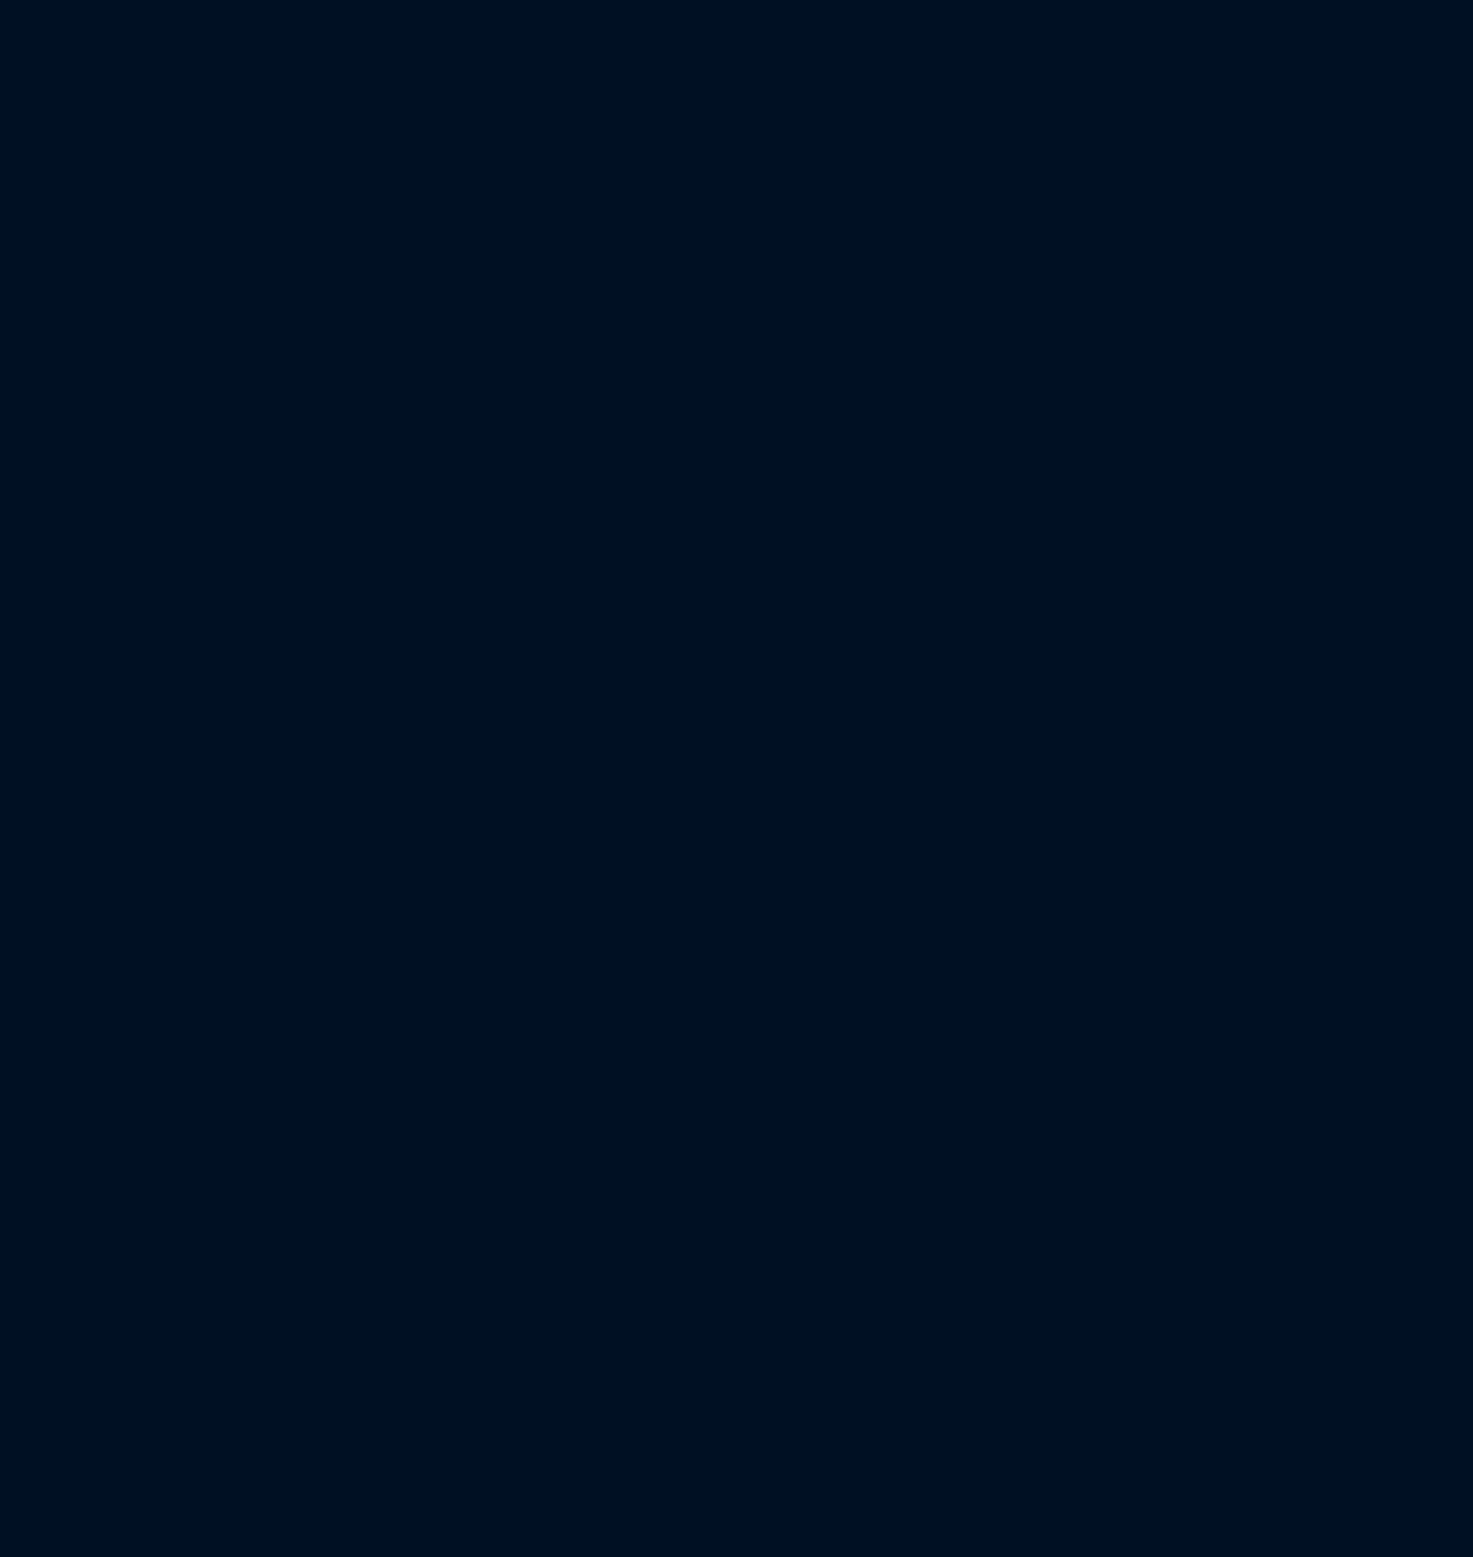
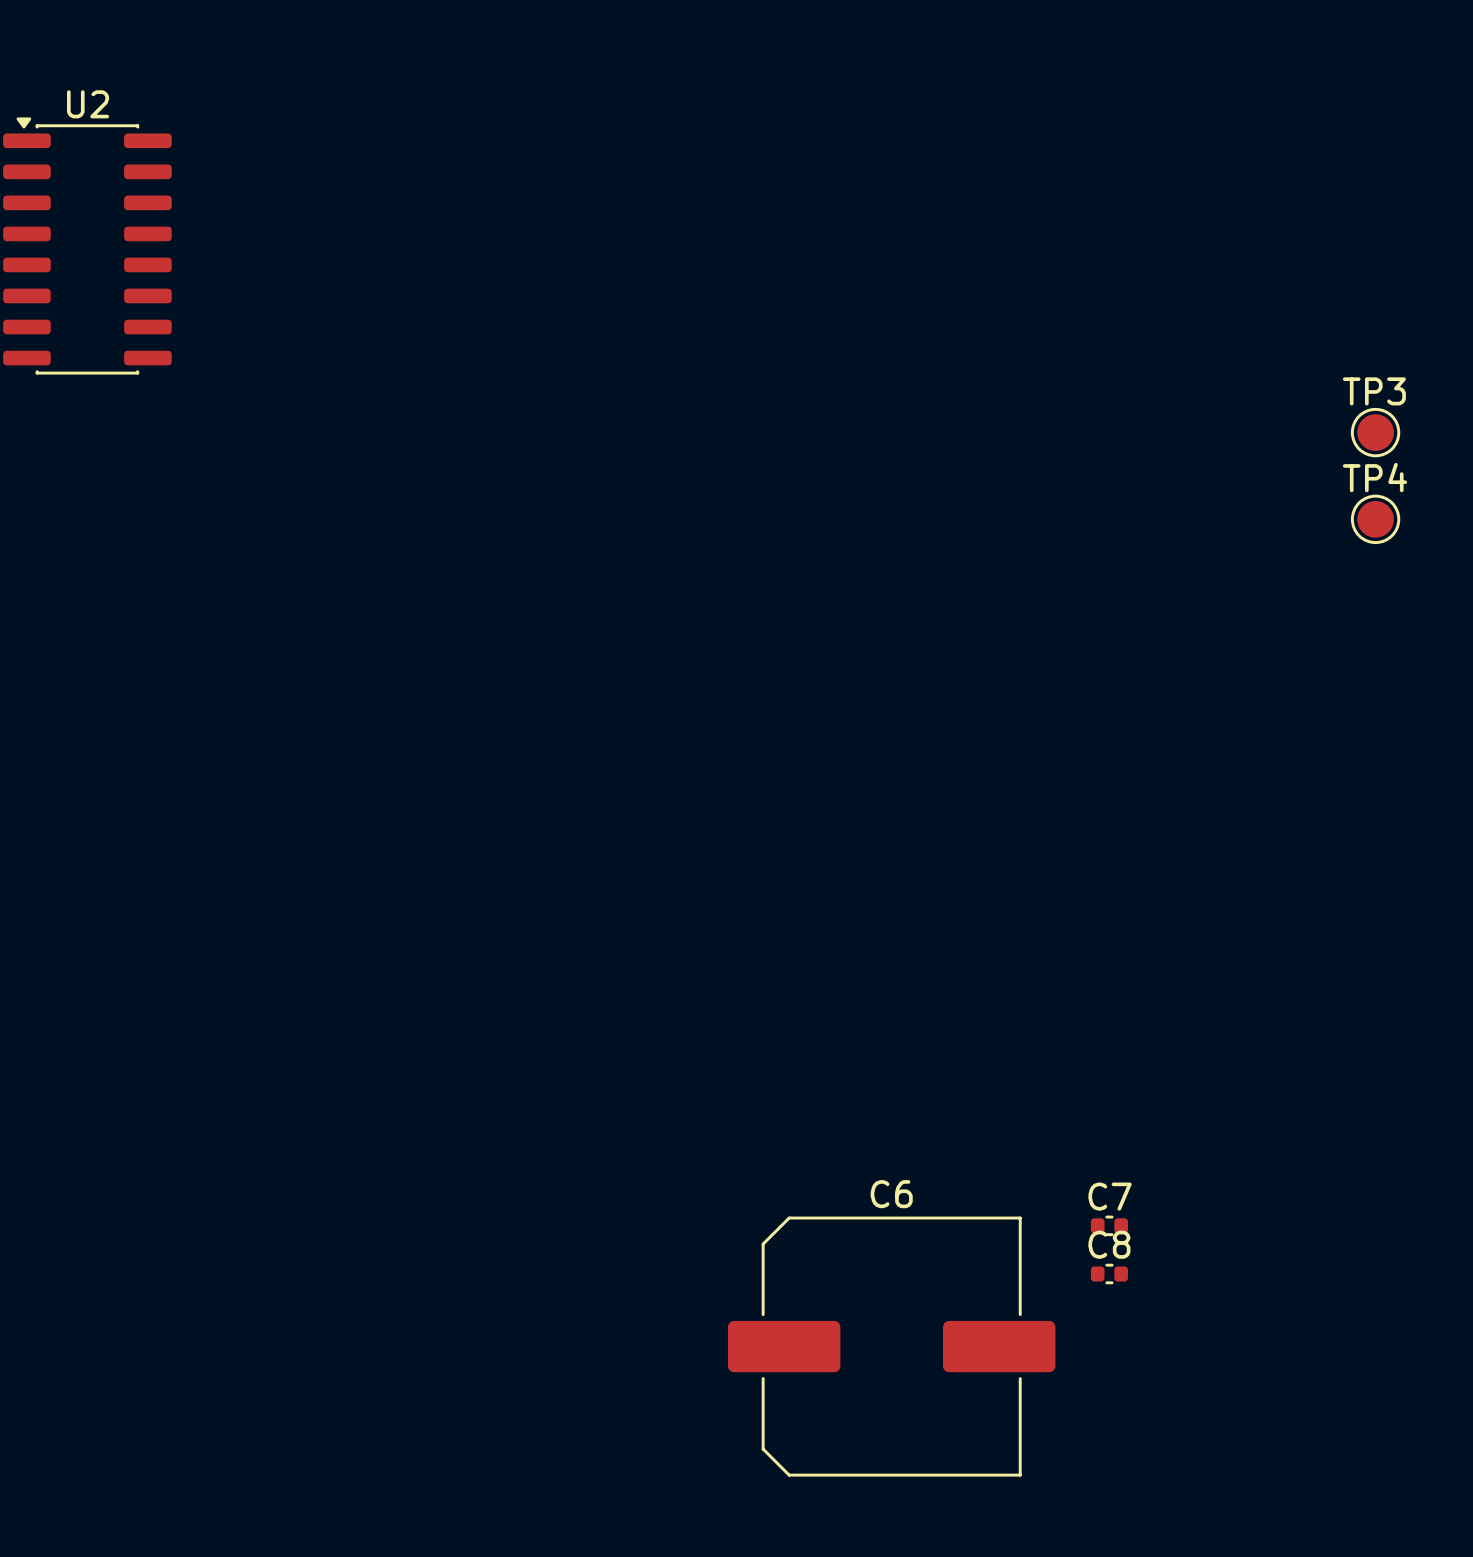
U2: none -> (87, 246)
TP3: none -> (1375, 432)
TP4: none -> (1375, 519)
C7: none -> (1109, 1225)
C8: none -> (1109, 1273)
C6: none -> (891, 1346)

